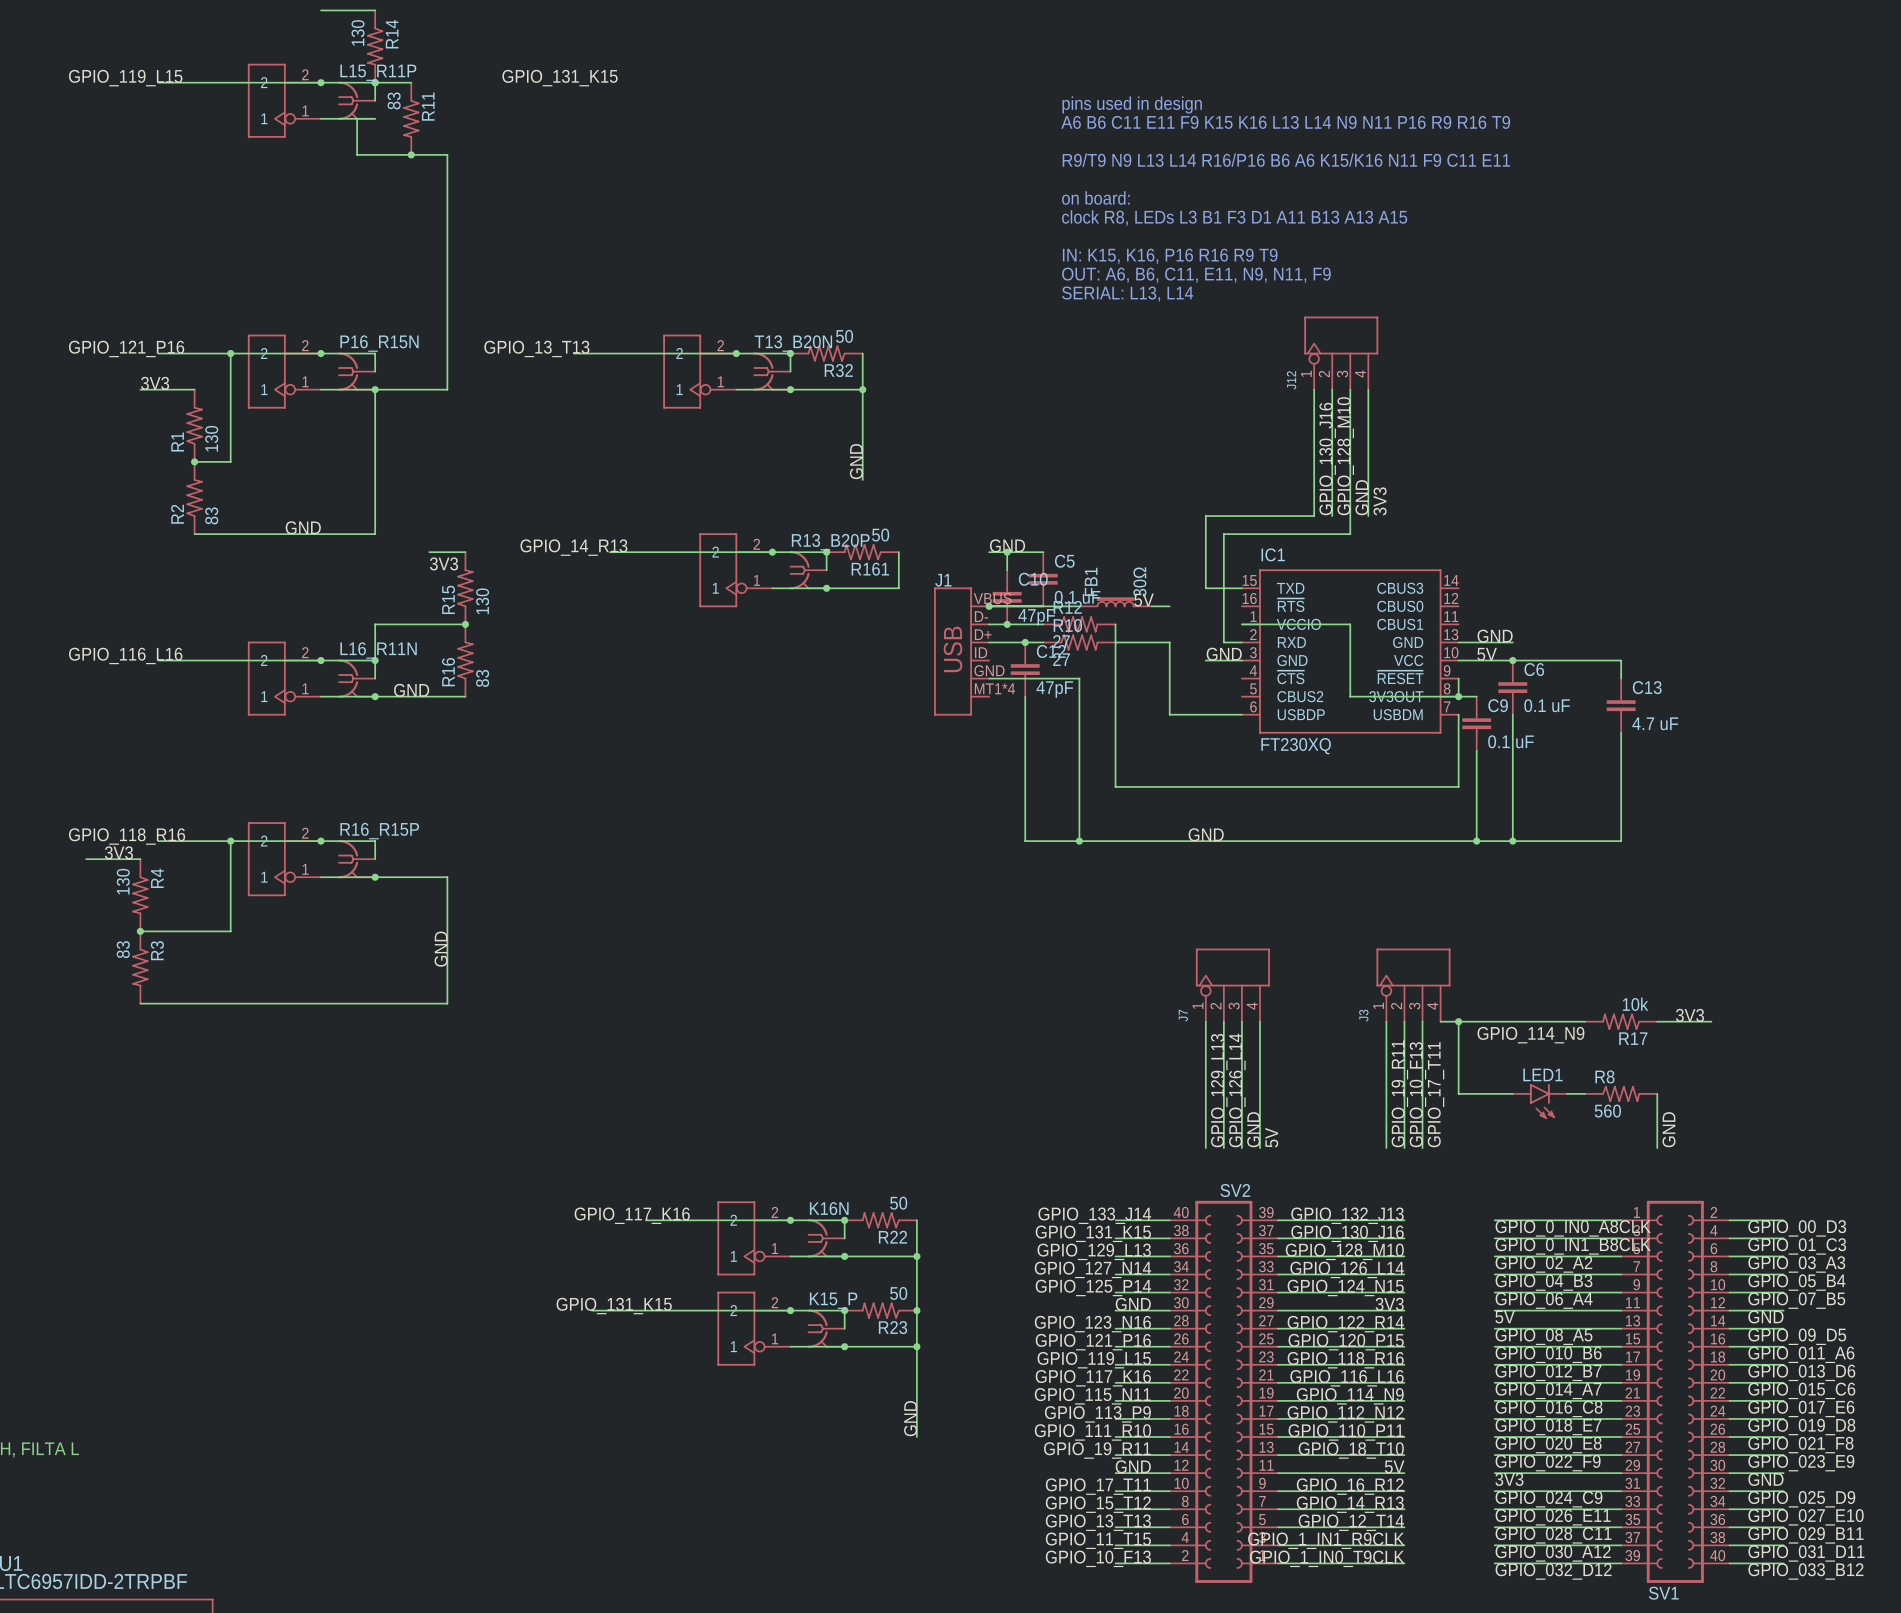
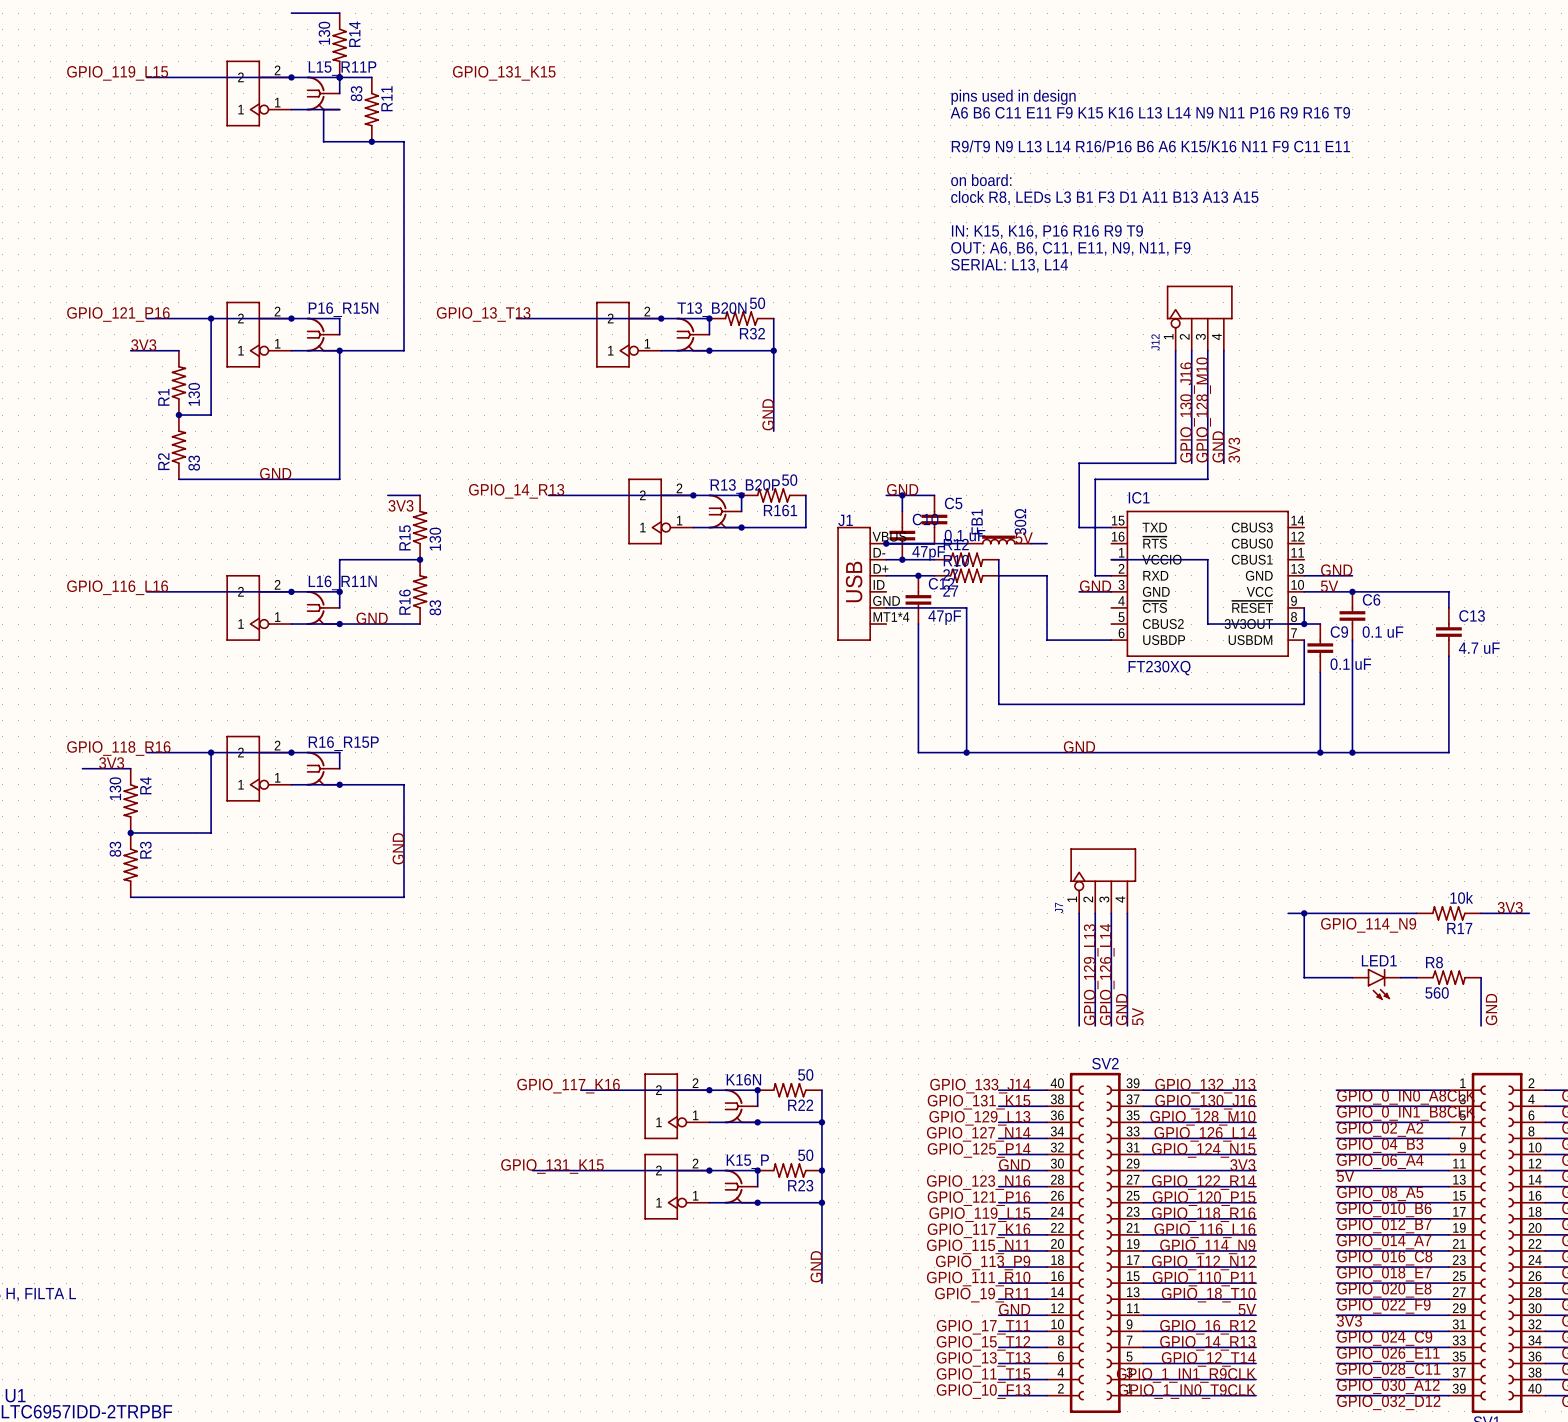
J3: (1413, 985) -> none
wire: (1386, 1021) (1386, 1148) -> none
wire: (1404, 1021) (1404, 1148) -> none
wire: (1422, 1021) (1422, 1148) -> none
label: GPIO_19_R11 (1399, 1093) -> none
label: GPIO_10_F13 (1417, 1094) -> none
label: GPIO_17_T11 (1435, 1094) -> none

